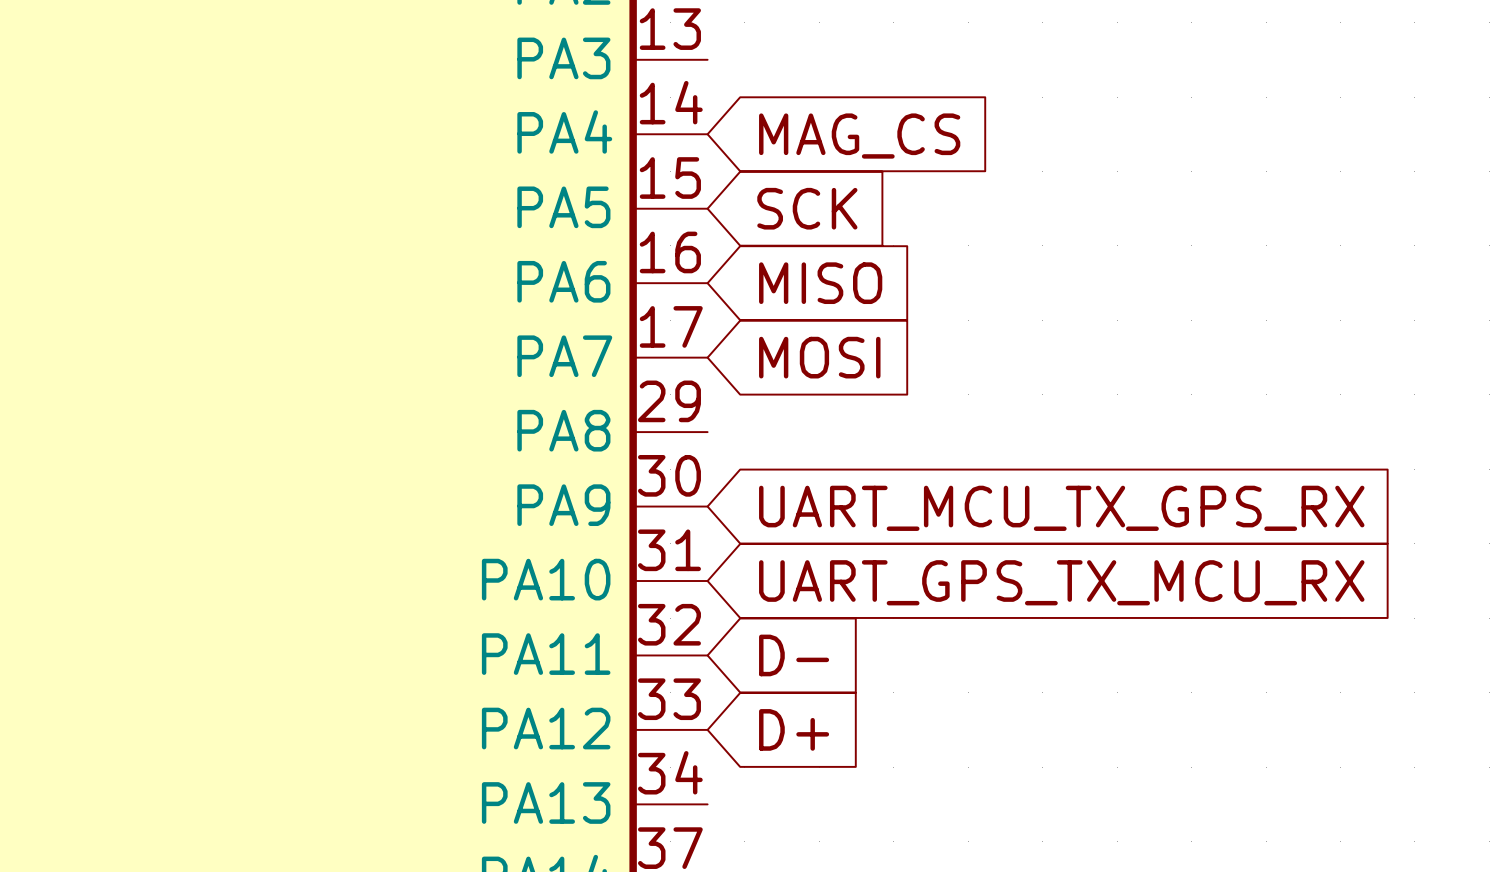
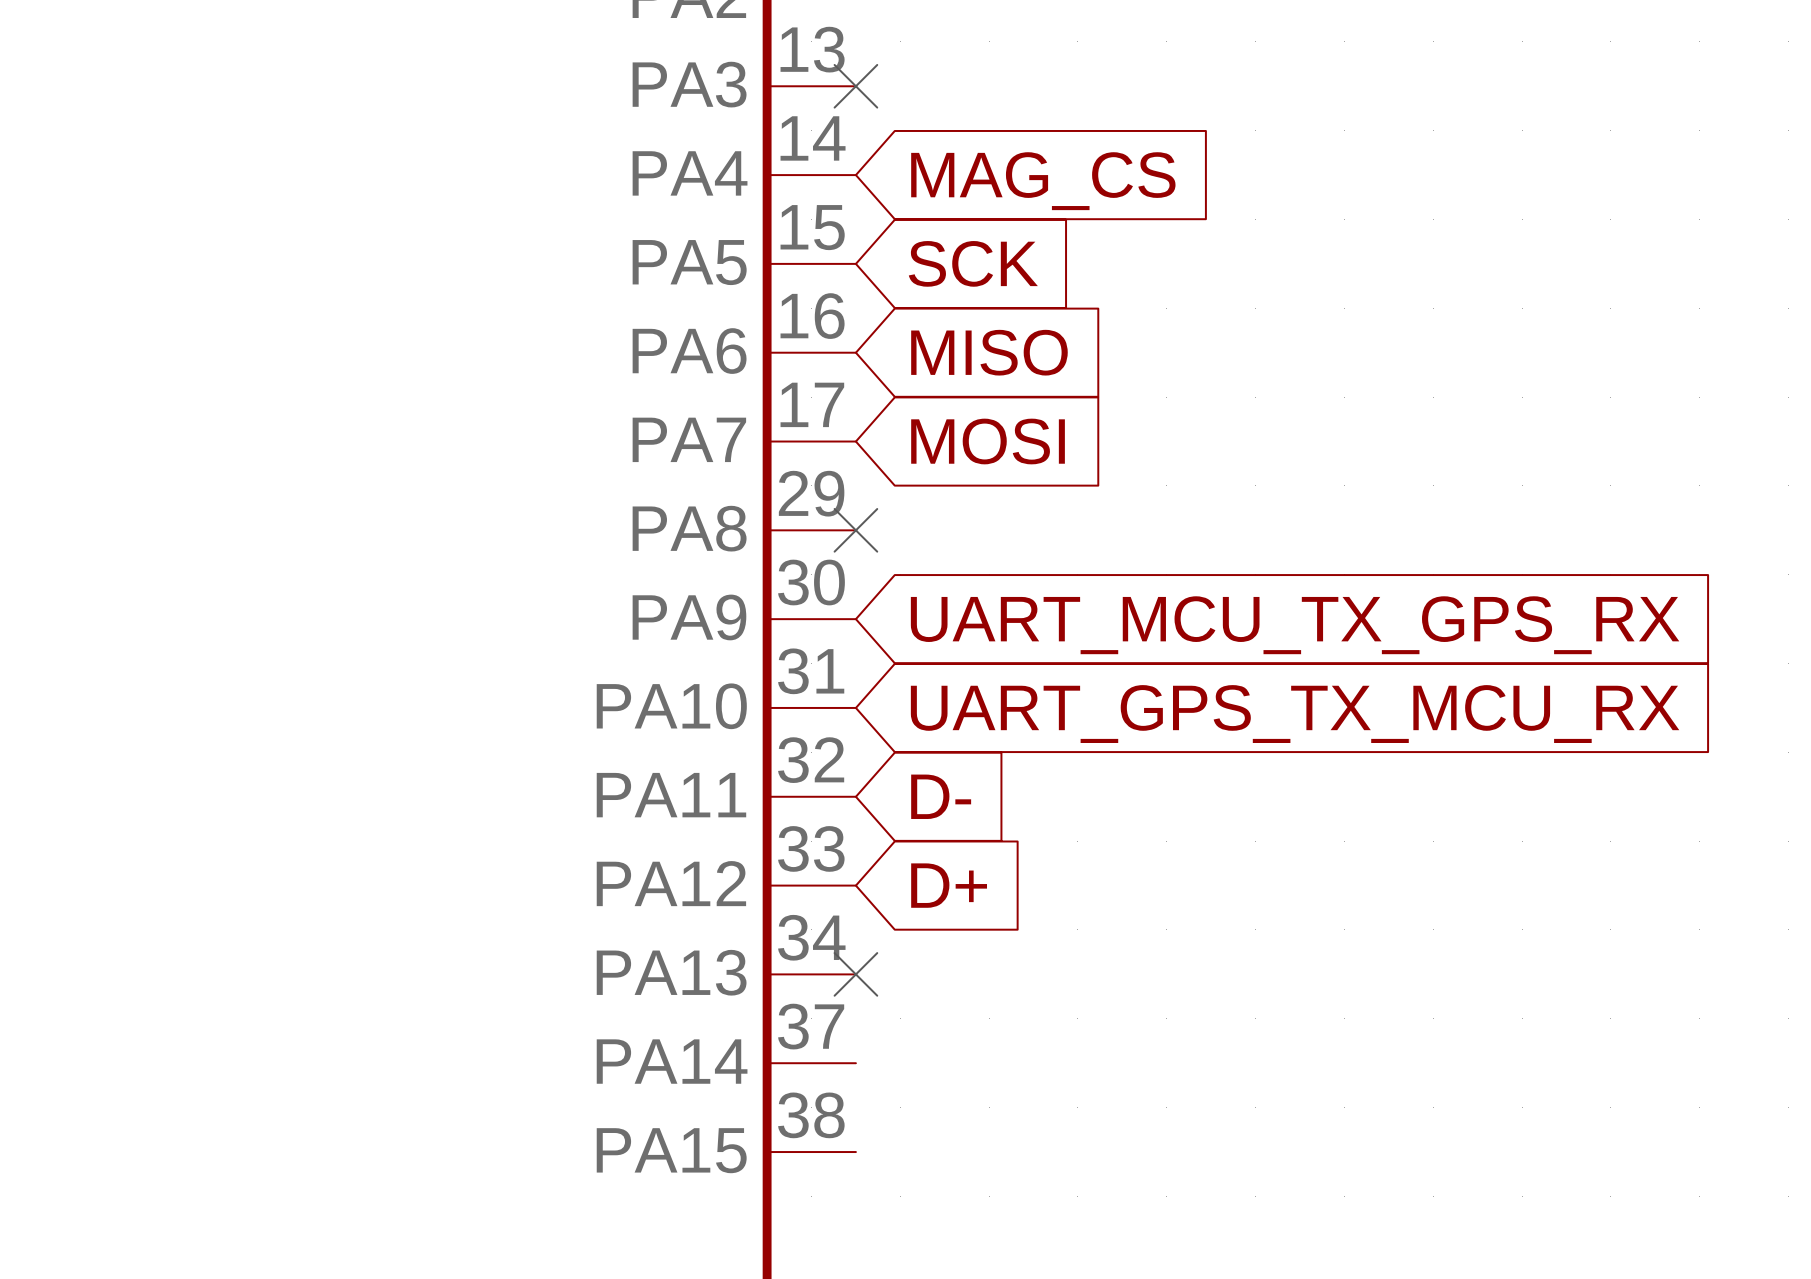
no-connect mark: none -> (855, 86)
no-connect mark: none -> (855, 530)
no-connect mark: none -> (855, 974)

